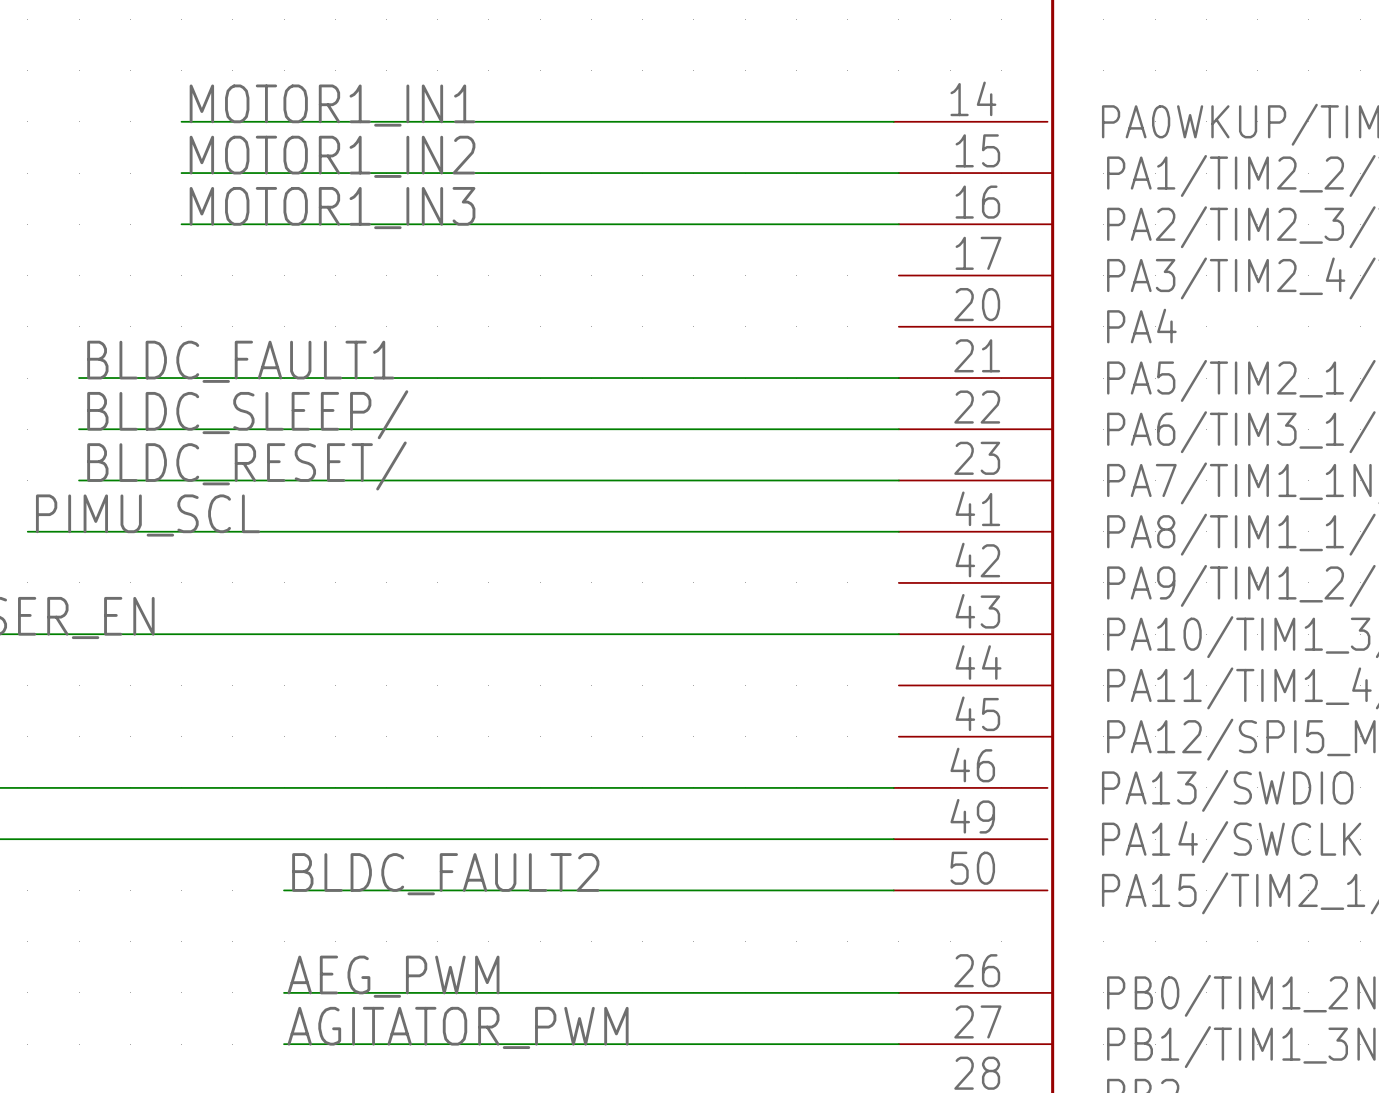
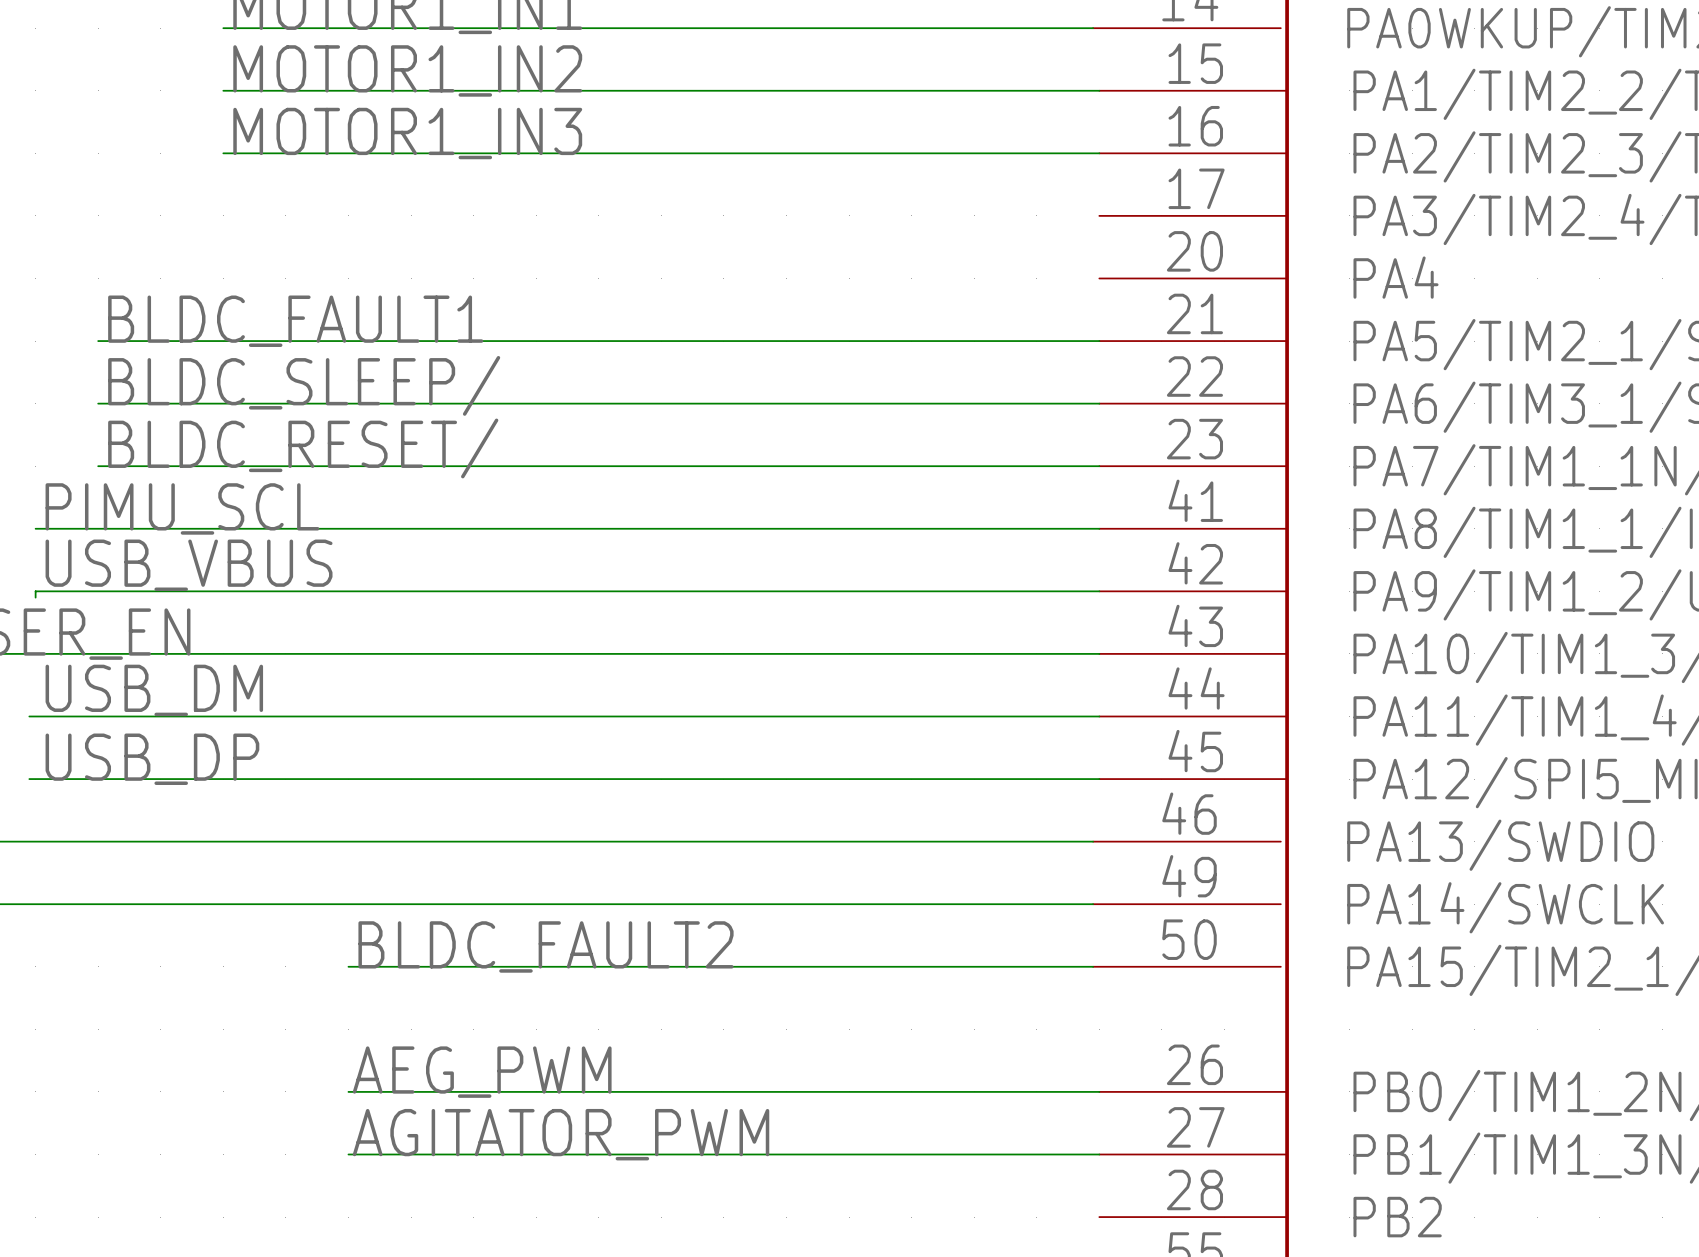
label: none -> USB_VBUS (189, 565)
wire: none -> (1099, 591) (35, 591) (35, 597)
label: none -> USB_DM (154, 690)
wire: none -> (29, 716) (1099, 716)
label: none -> USB_DP (152, 759)
wire: none -> (29, 779) (1099, 779)

